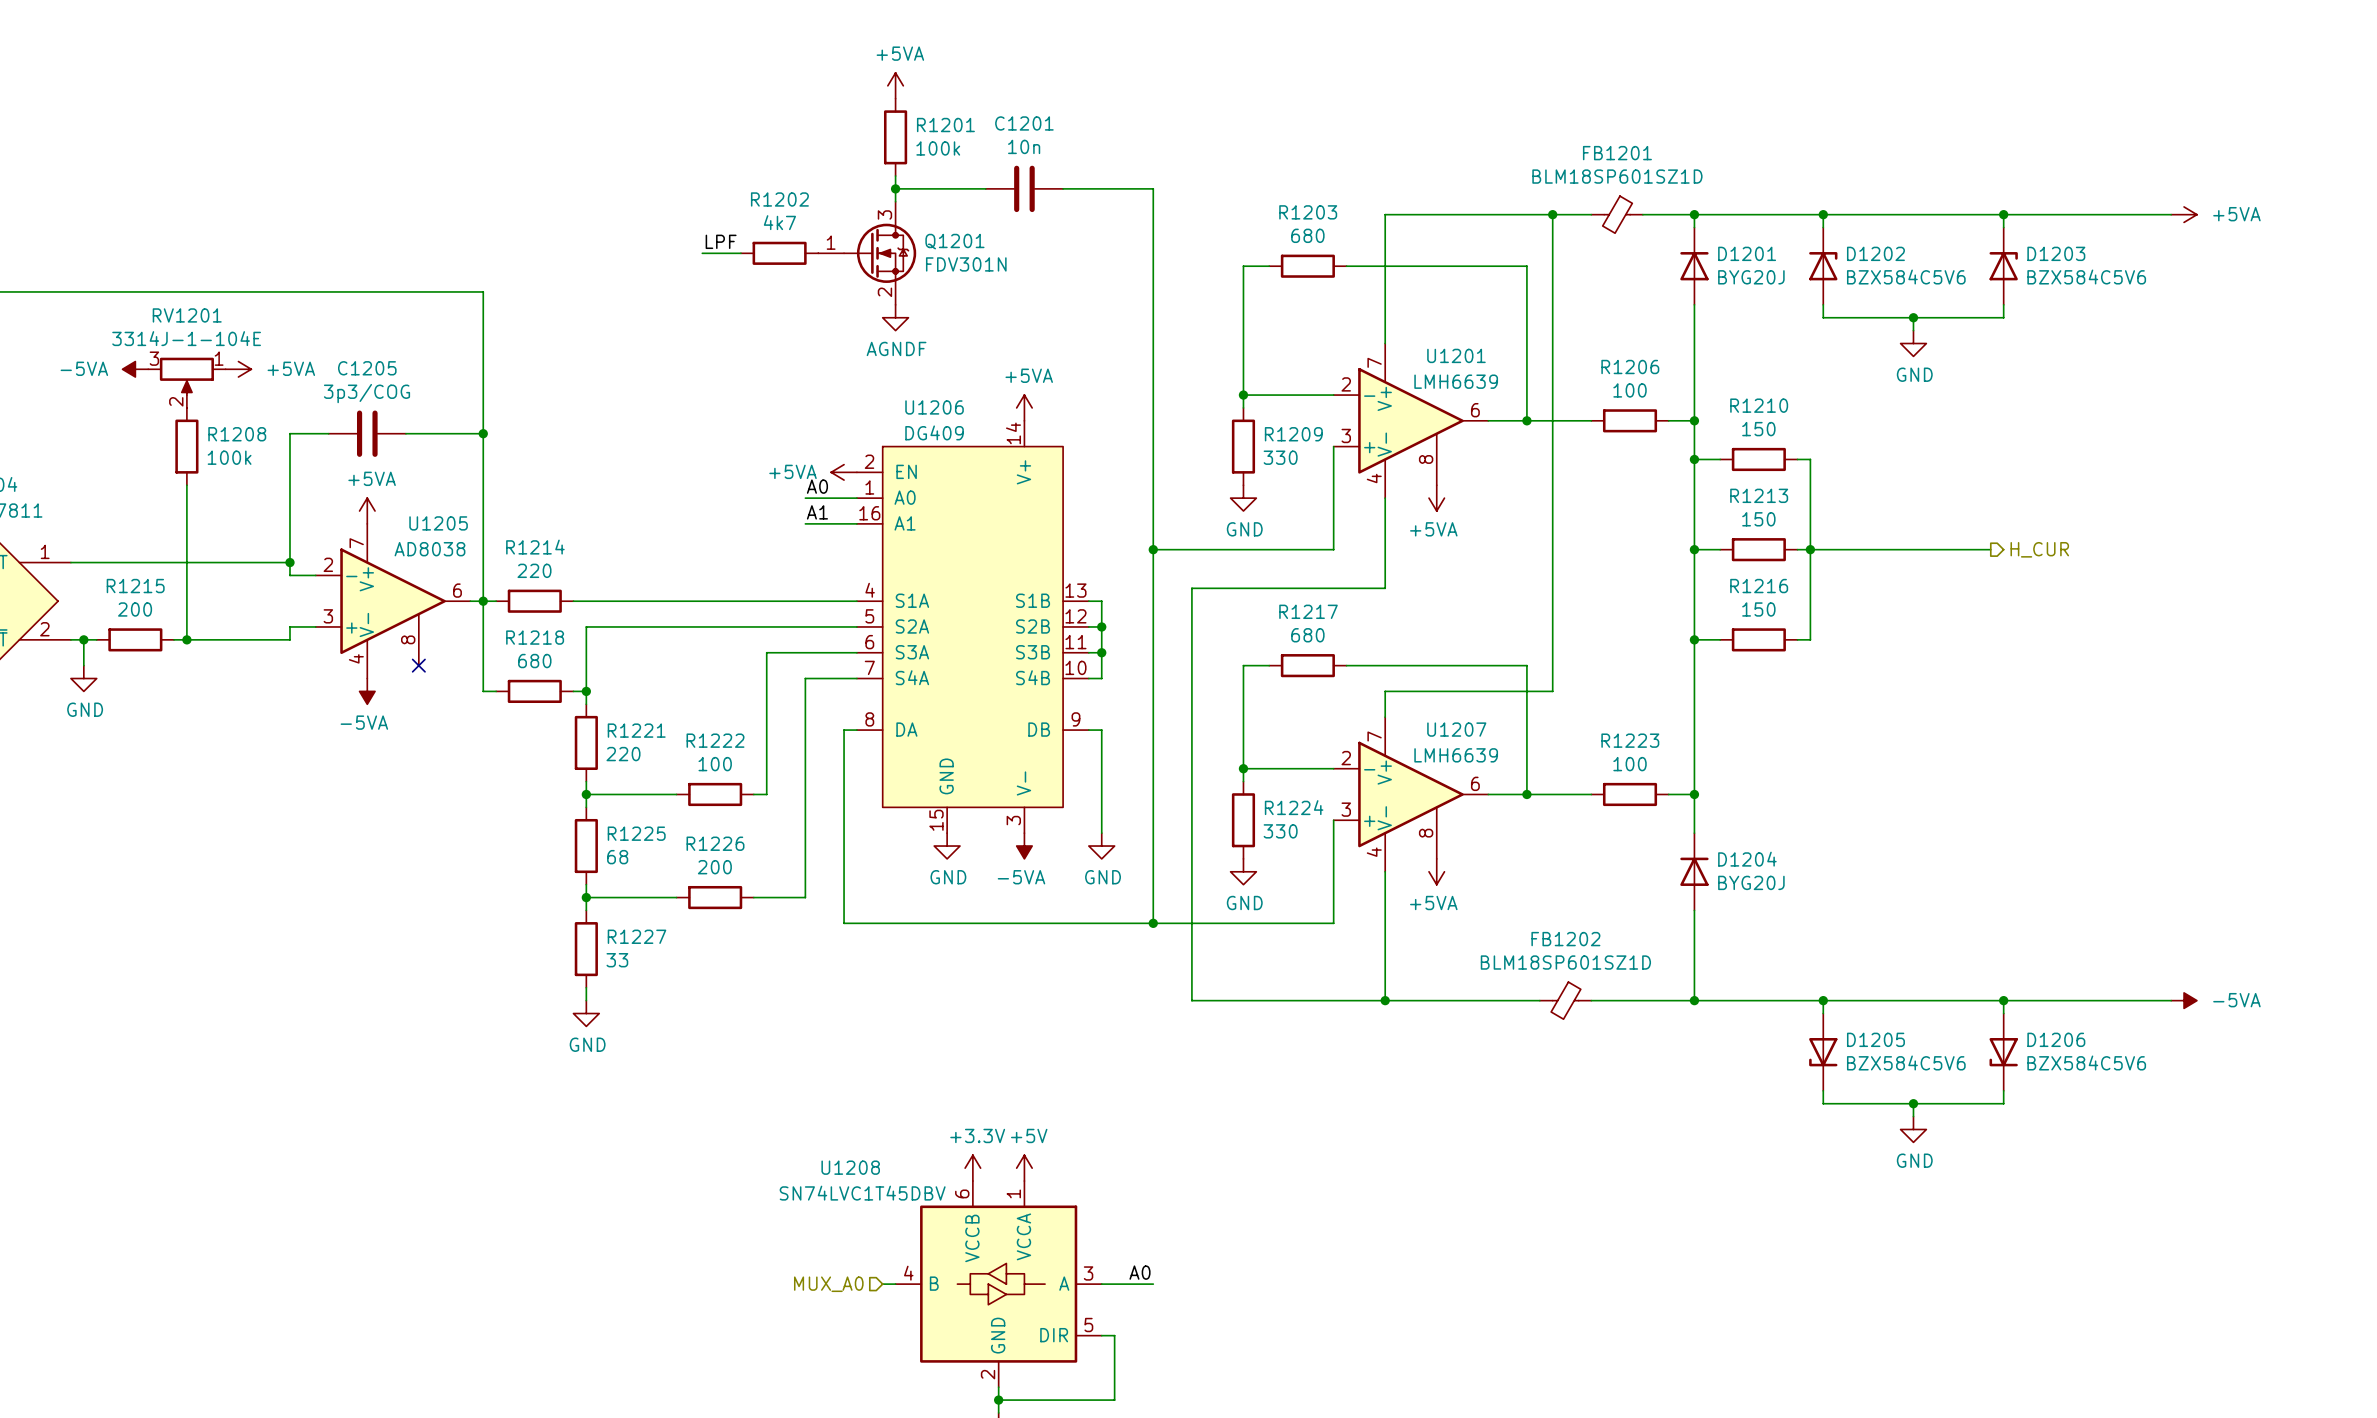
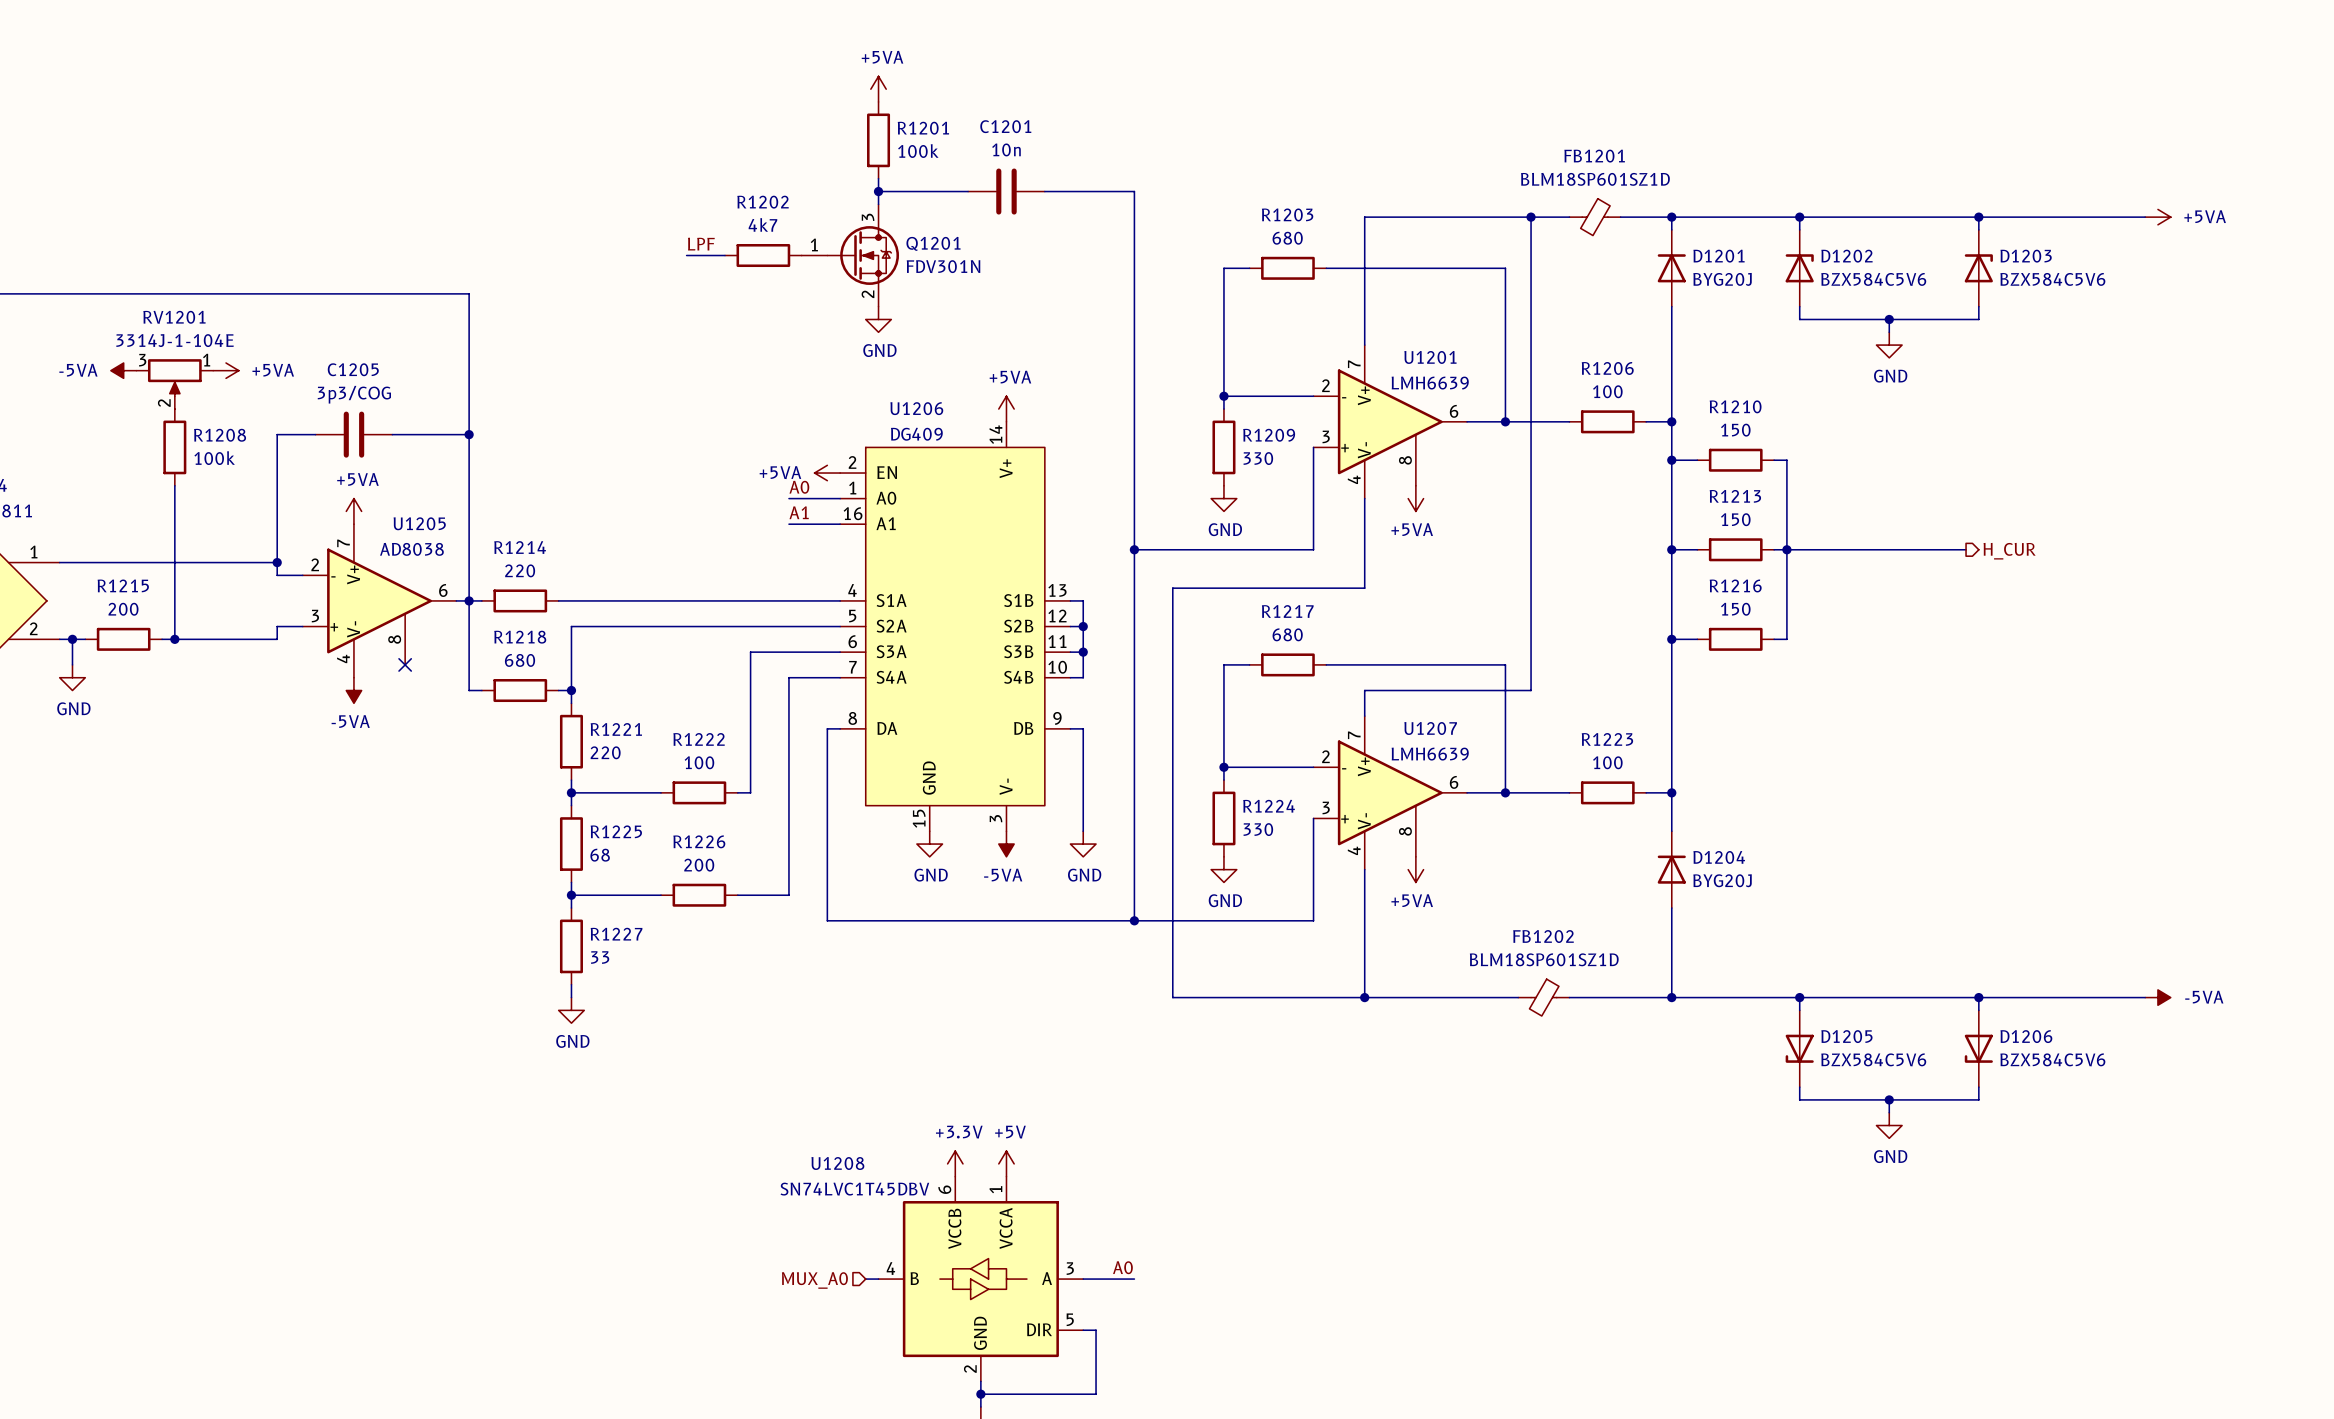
power symbol: AGNDF (895, 317) -> GND (878, 319)

